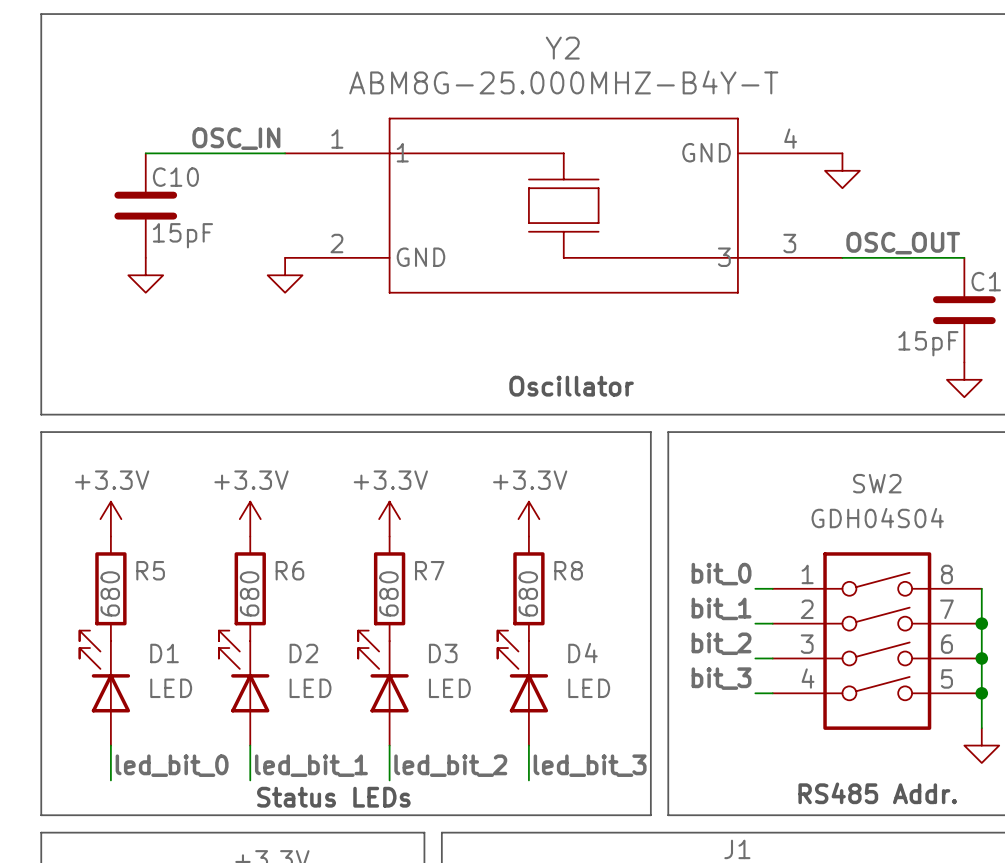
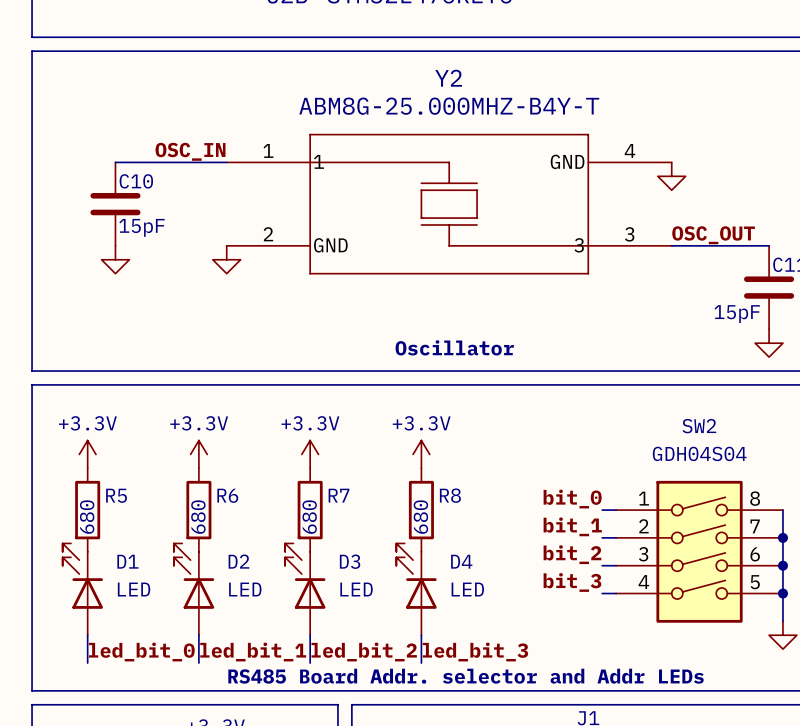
line: (650, 432) (650, 815) -> (518, 384) (532, 384)
line: (668, 432) (668, 815) -> (518, 690) (532, 690)
text: RS485 Addr. (877, 793) -> none
text: none -> RS485 Board Addr. selector and Addr LEDs (466, 676)
text: Status LEDs (333, 797) -> none

